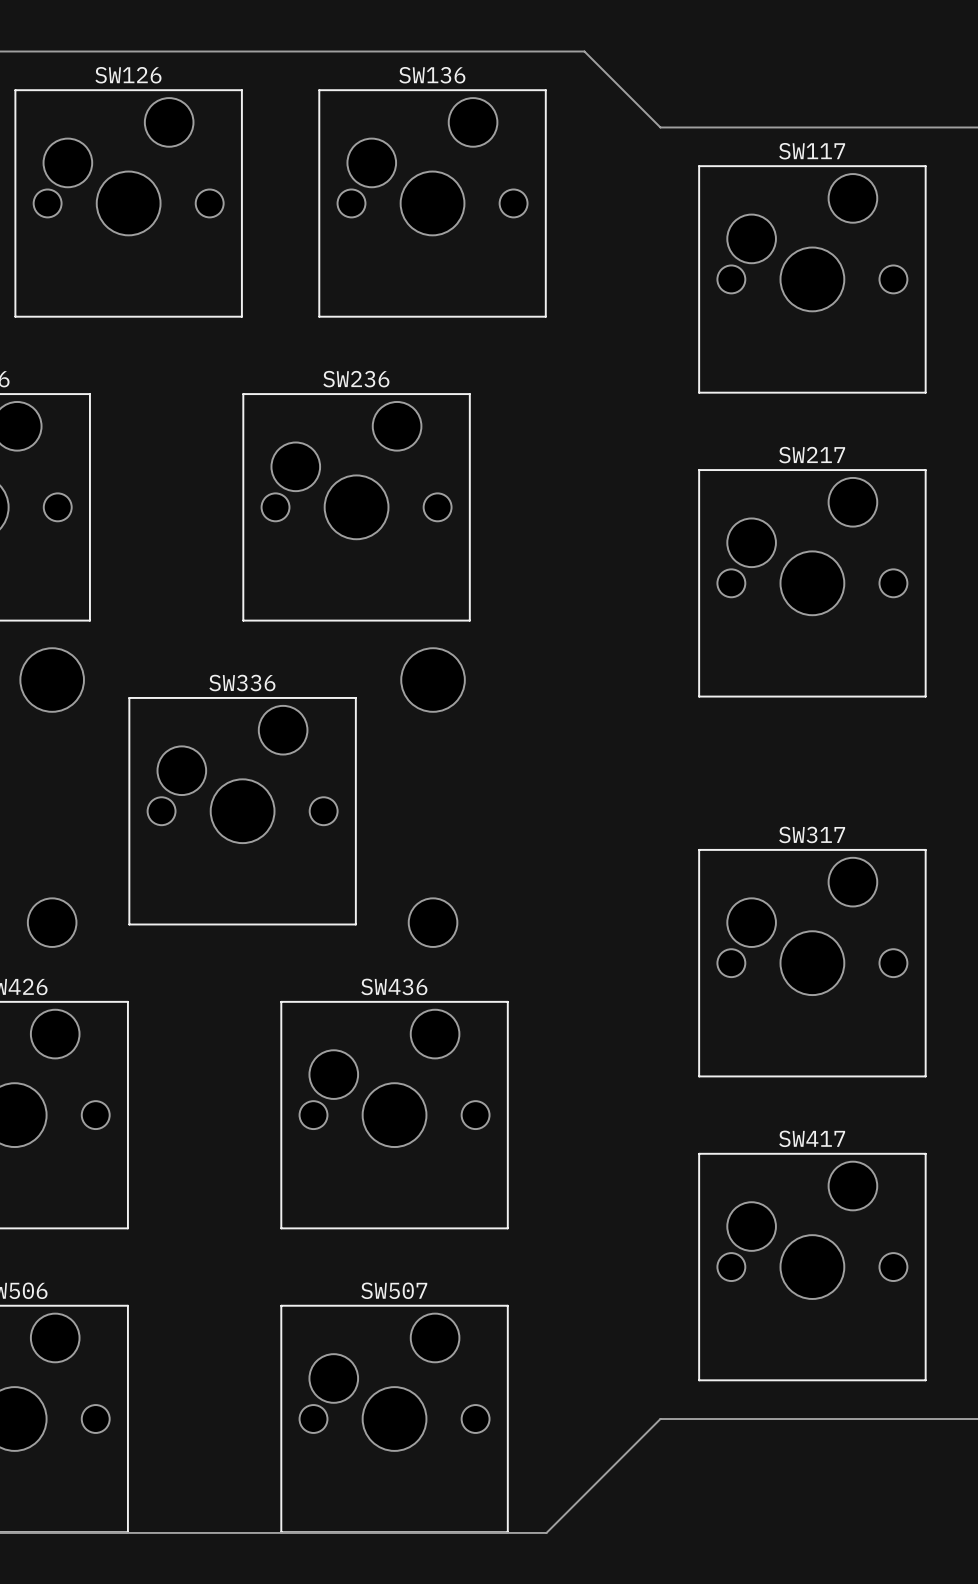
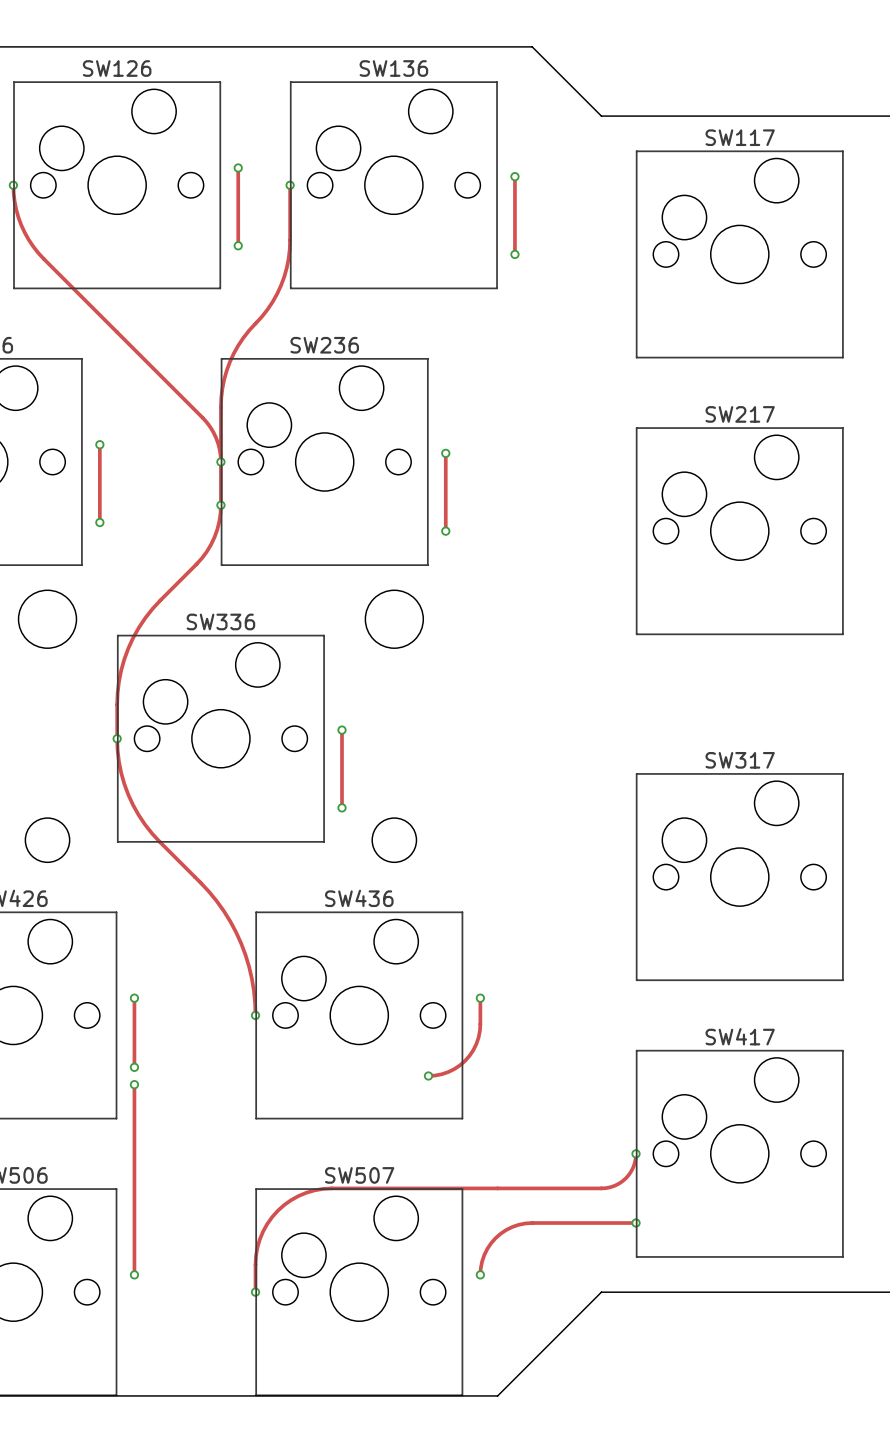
track: none -> (238, 167) (238, 245)
via: none -> (238, 167)
track: none -> (514, 176) (514, 254)
via: none -> (514, 176)
track: none -> (13, 185) (18, 217) (33, 246) (206, 422) (218, 443) (220, 461)
via: none -> (13, 185)
track: none -> (290, 185) (289, 249) (284, 276) (267, 309) (238, 345) (224, 379) (220, 407) (220, 505) (217, 529) (211, 544) (201, 558) (152, 608) (138, 627) (124, 659) (117, 693) (117, 750) (121, 772) (128, 794) (138, 815) (152, 833) (208, 891) (230, 921) (241, 943) (249, 966) (253, 990) (255, 1015)
via: none -> (290, 185)
via: none -> (238, 245)
via: none -> (514, 254)
track: none -> (99, 444) (99, 522)
via: none -> (99, 444)
track: none -> (445, 453) (445, 531)
via: none -> (445, 453)
via: none -> (220, 461)
via: none -> (220, 505)
via: none -> (99, 522)
via: none -> (445, 531)
track: none -> (342, 730) (342, 807)
via: none -> (342, 730)
via: none -> (117, 738)
via: none -> (342, 807)
track: none -> (134, 998) (134, 1067)
via: none -> (134, 998)
track: none -> (480, 998) (479, 1030) (473, 1050) (465, 1060) (454, 1069) (441, 1074) (428, 1075)
via: none -> (480, 998)
via: none -> (255, 1015)
via: none -> (134, 1067)
via: none -> (428, 1075)
track: none -> (134, 1084) (134, 1274)
via: none -> (134, 1084)
track: none -> (636, 1153) (634, 1162) (628, 1174) (618, 1183) (605, 1188) (331, 1188) (306, 1192) (284, 1205) (272, 1217) (263, 1231) (256, 1256) (255, 1292)
via: none -> (636, 1153)
track: none -> (636, 1223) (532, 1223) (518, 1224) (506, 1229) (491, 1243) (484, 1255) (480, 1274)
via: none -> (636, 1223)
via: none -> (134, 1274)
via: none -> (480, 1274)
via: none -> (255, 1292)

